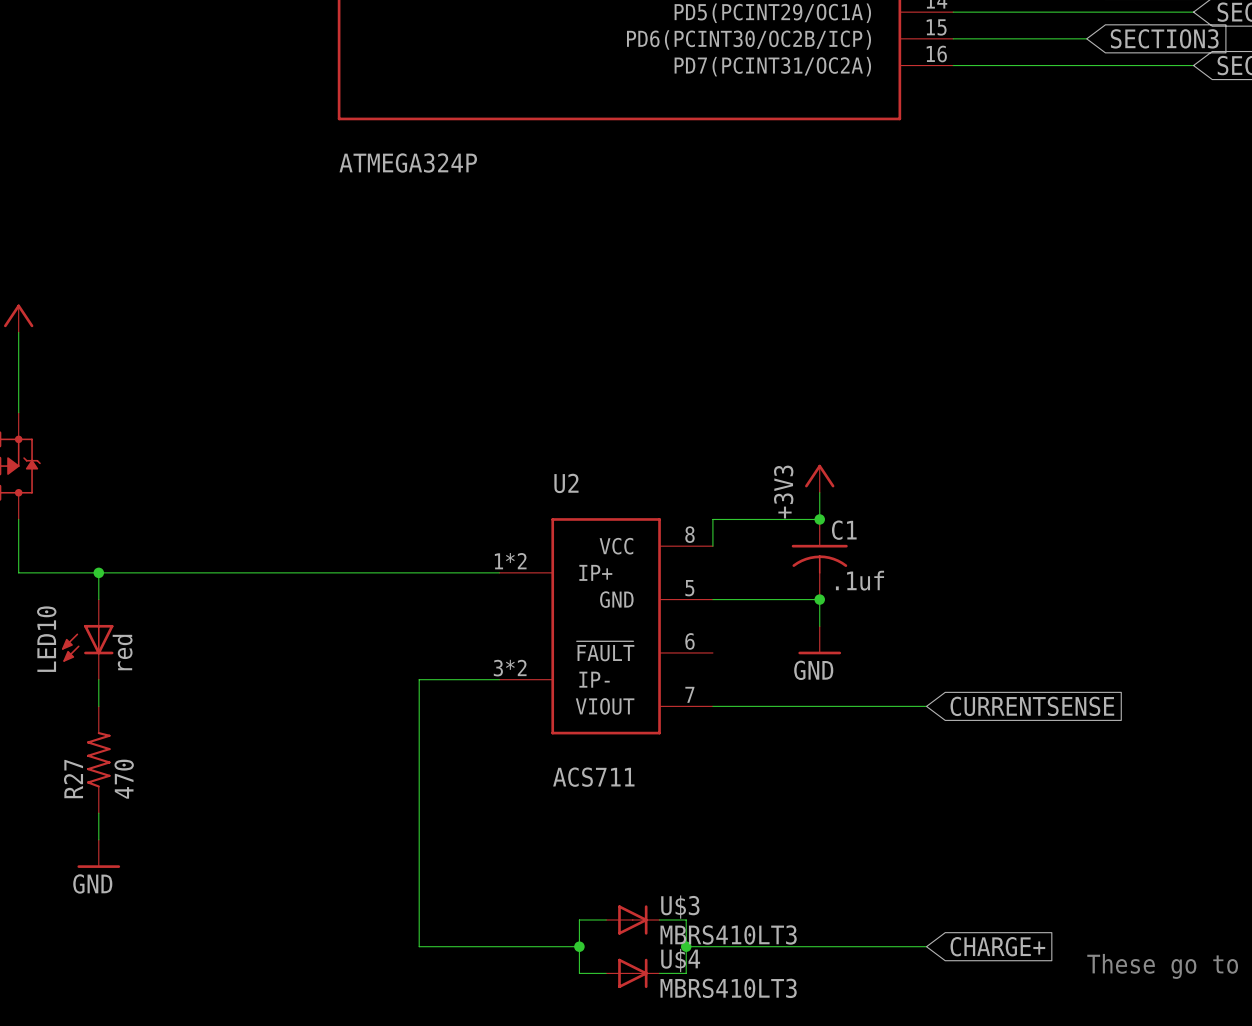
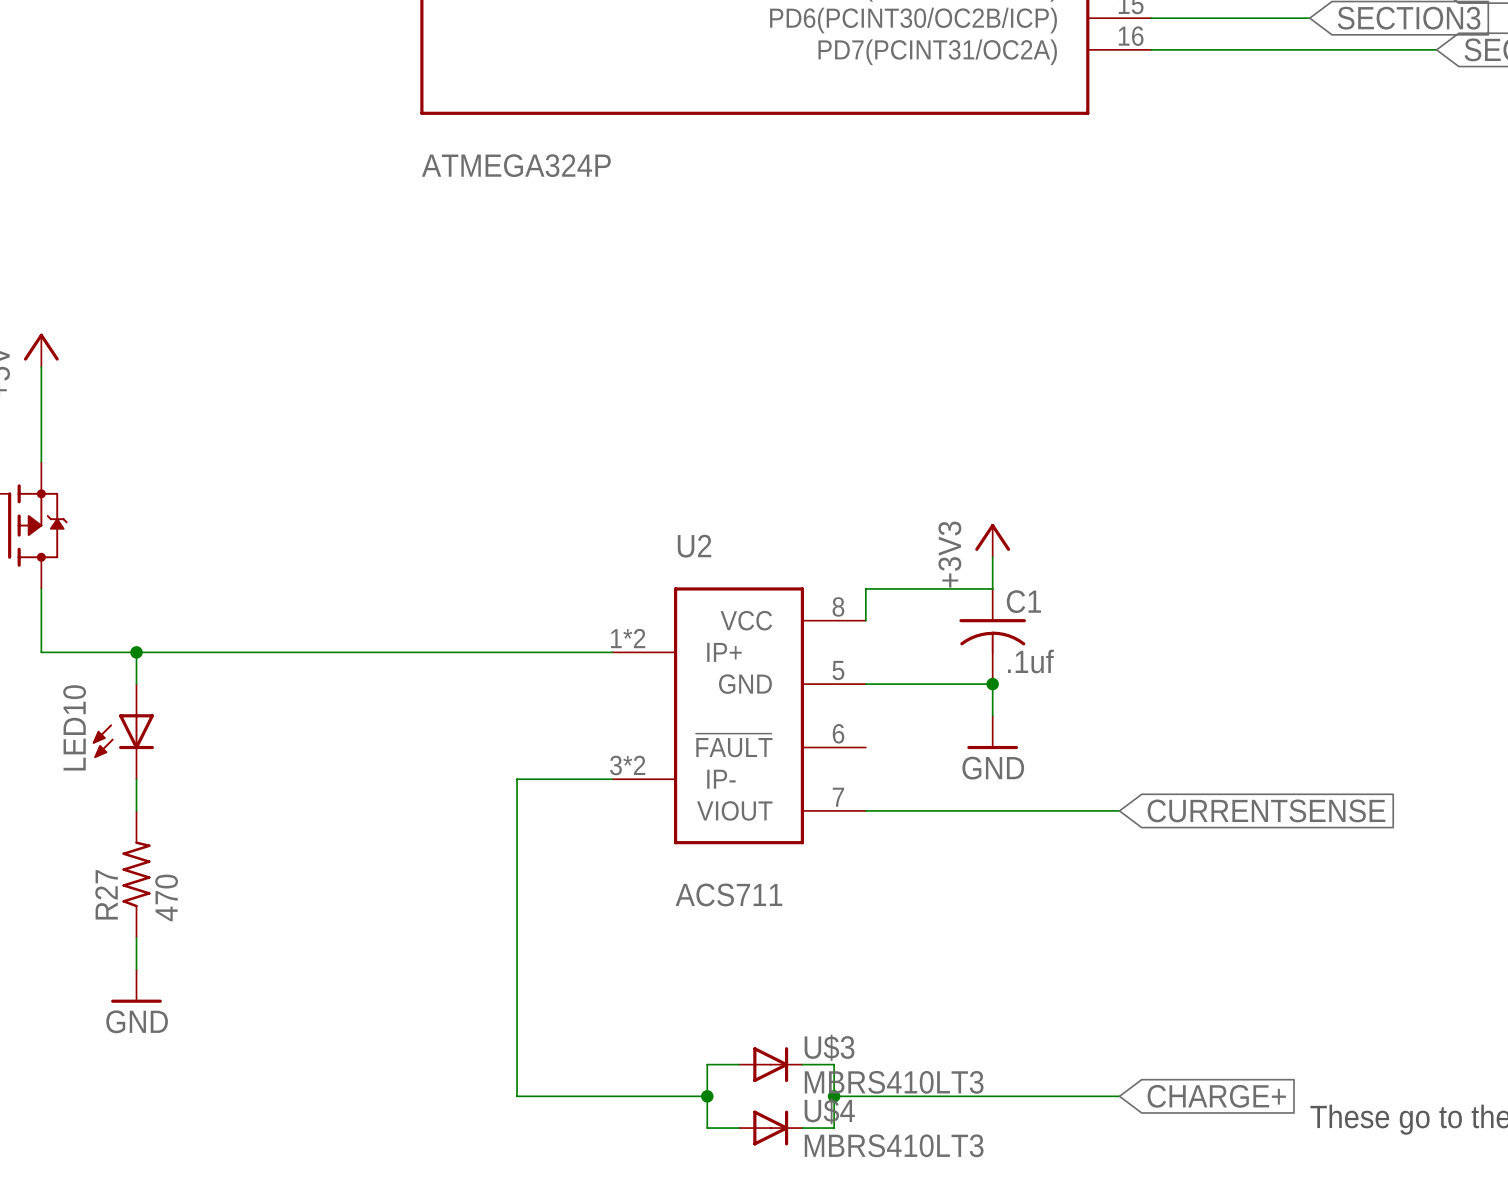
junction: (819, 519) -> none
LED10 value: red (122, 652) -> none

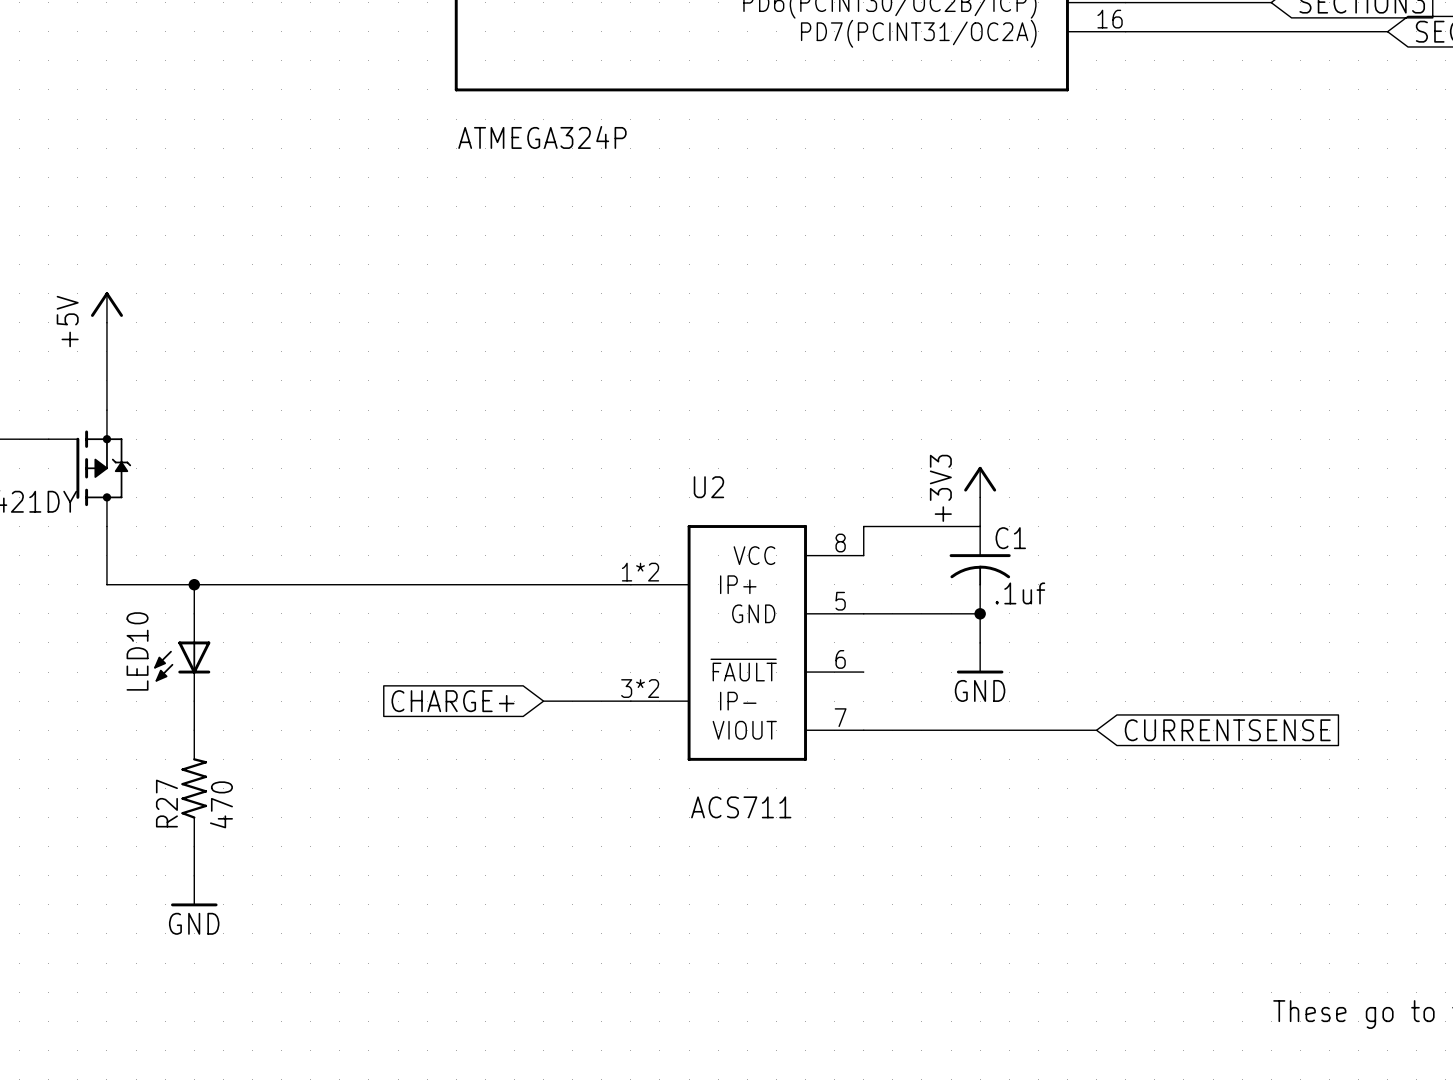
global label: none -> CHARGE+ (452, 701)
wire: (517, 779) (517, 1096) (707, 1096) -> none
wire: (738, 1064) (707, 1064) (707, 1128) (738, 1128) -> none
U$3: MBRS410LT3 (770, 1064) -> none
wire: (802, 1064) (834, 1064) (834, 1128) (802, 1128) -> none
junction: (707, 1096) -> none
wire: (834, 1096) (1119, 1096) -> none
junction: (834, 1096) -> none
global label: CHARGE+ (1216, 1096) -> none
U$4: MBRS410LT3 (770, 1128) -> none

